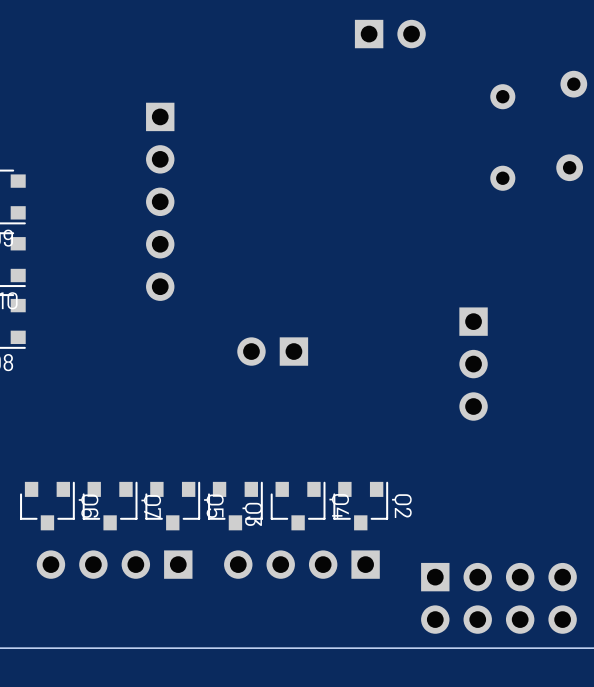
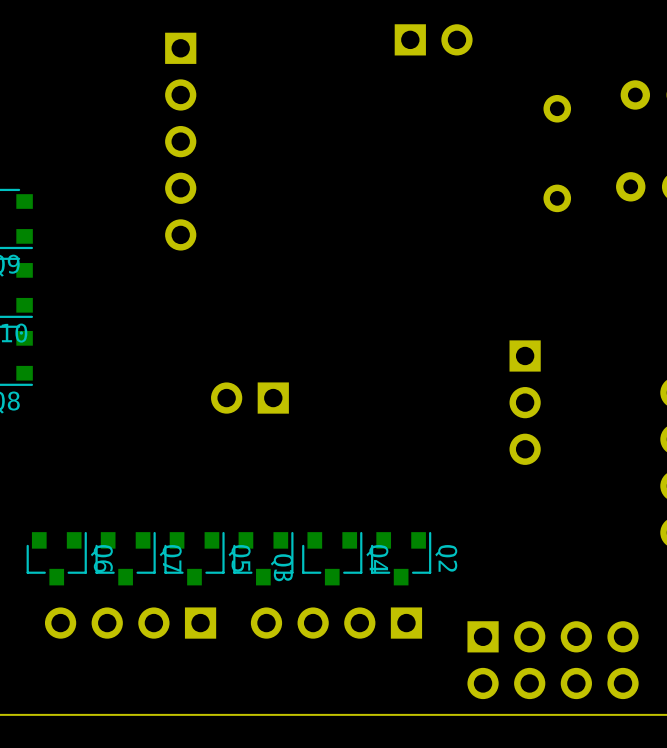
part position: (160, 201) -> (180, 141)
part position: (272, 351) -> (249, 398)

